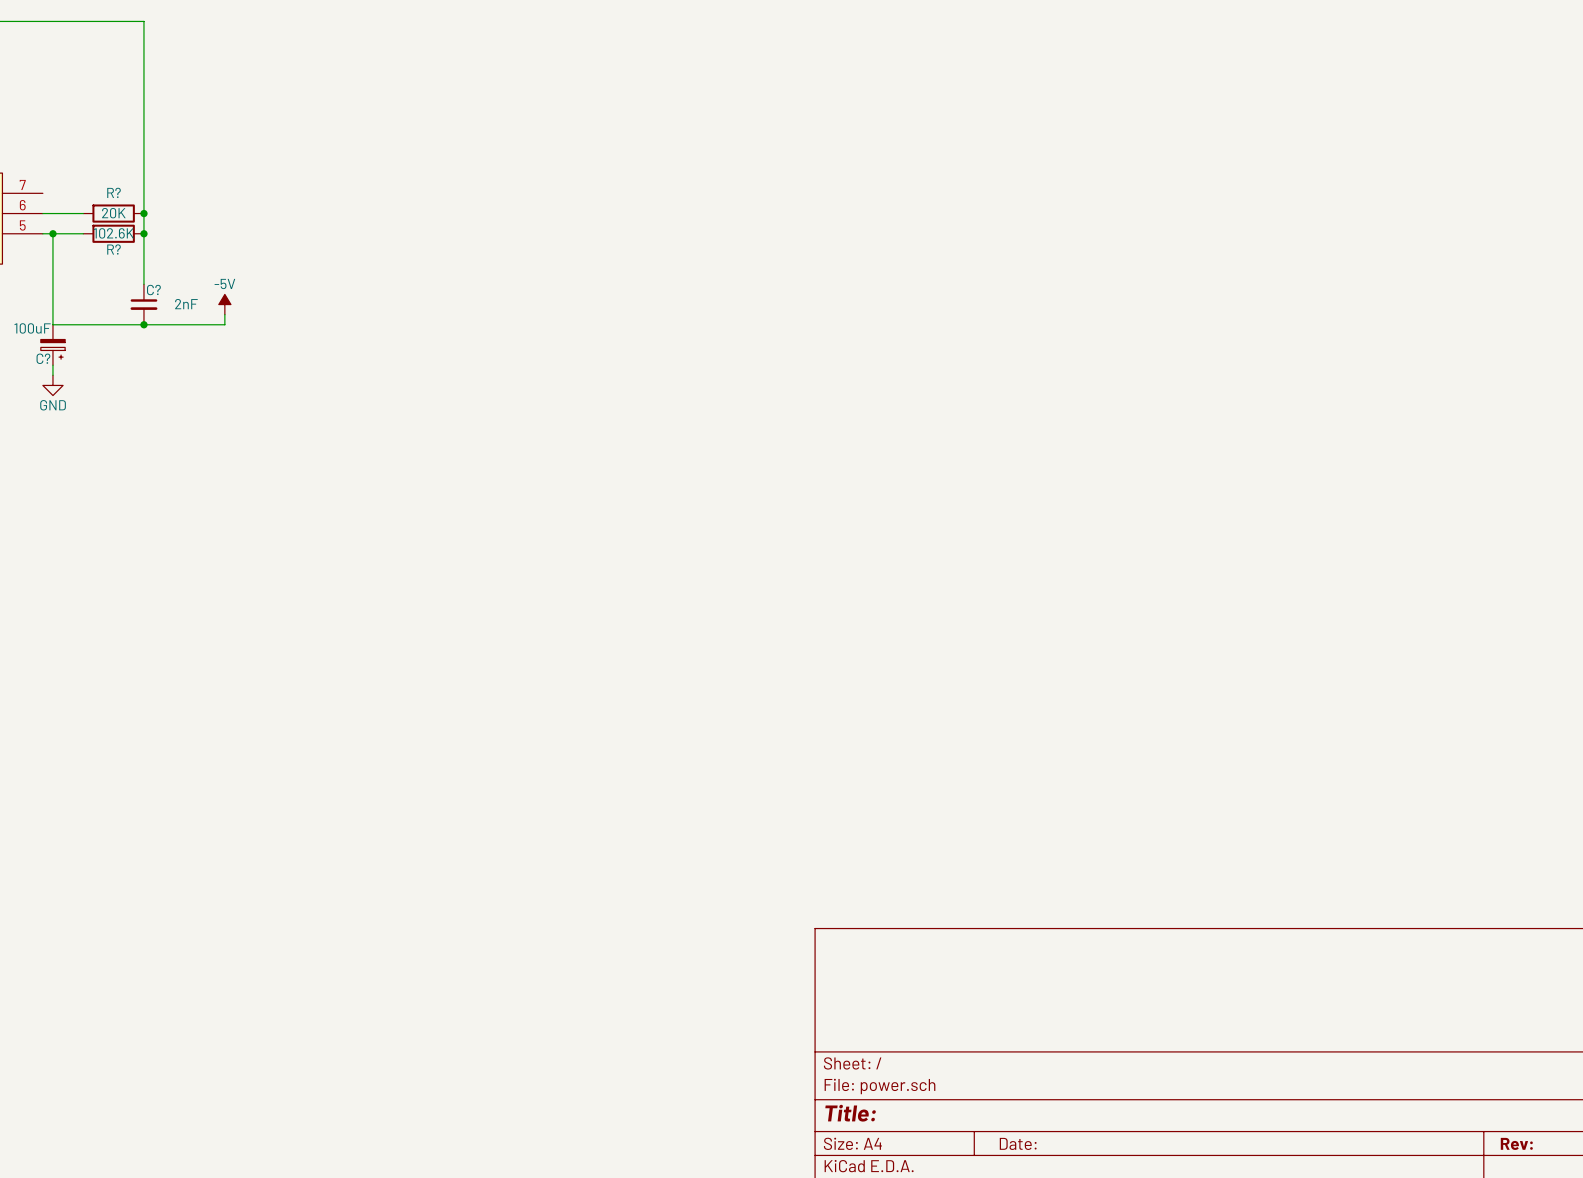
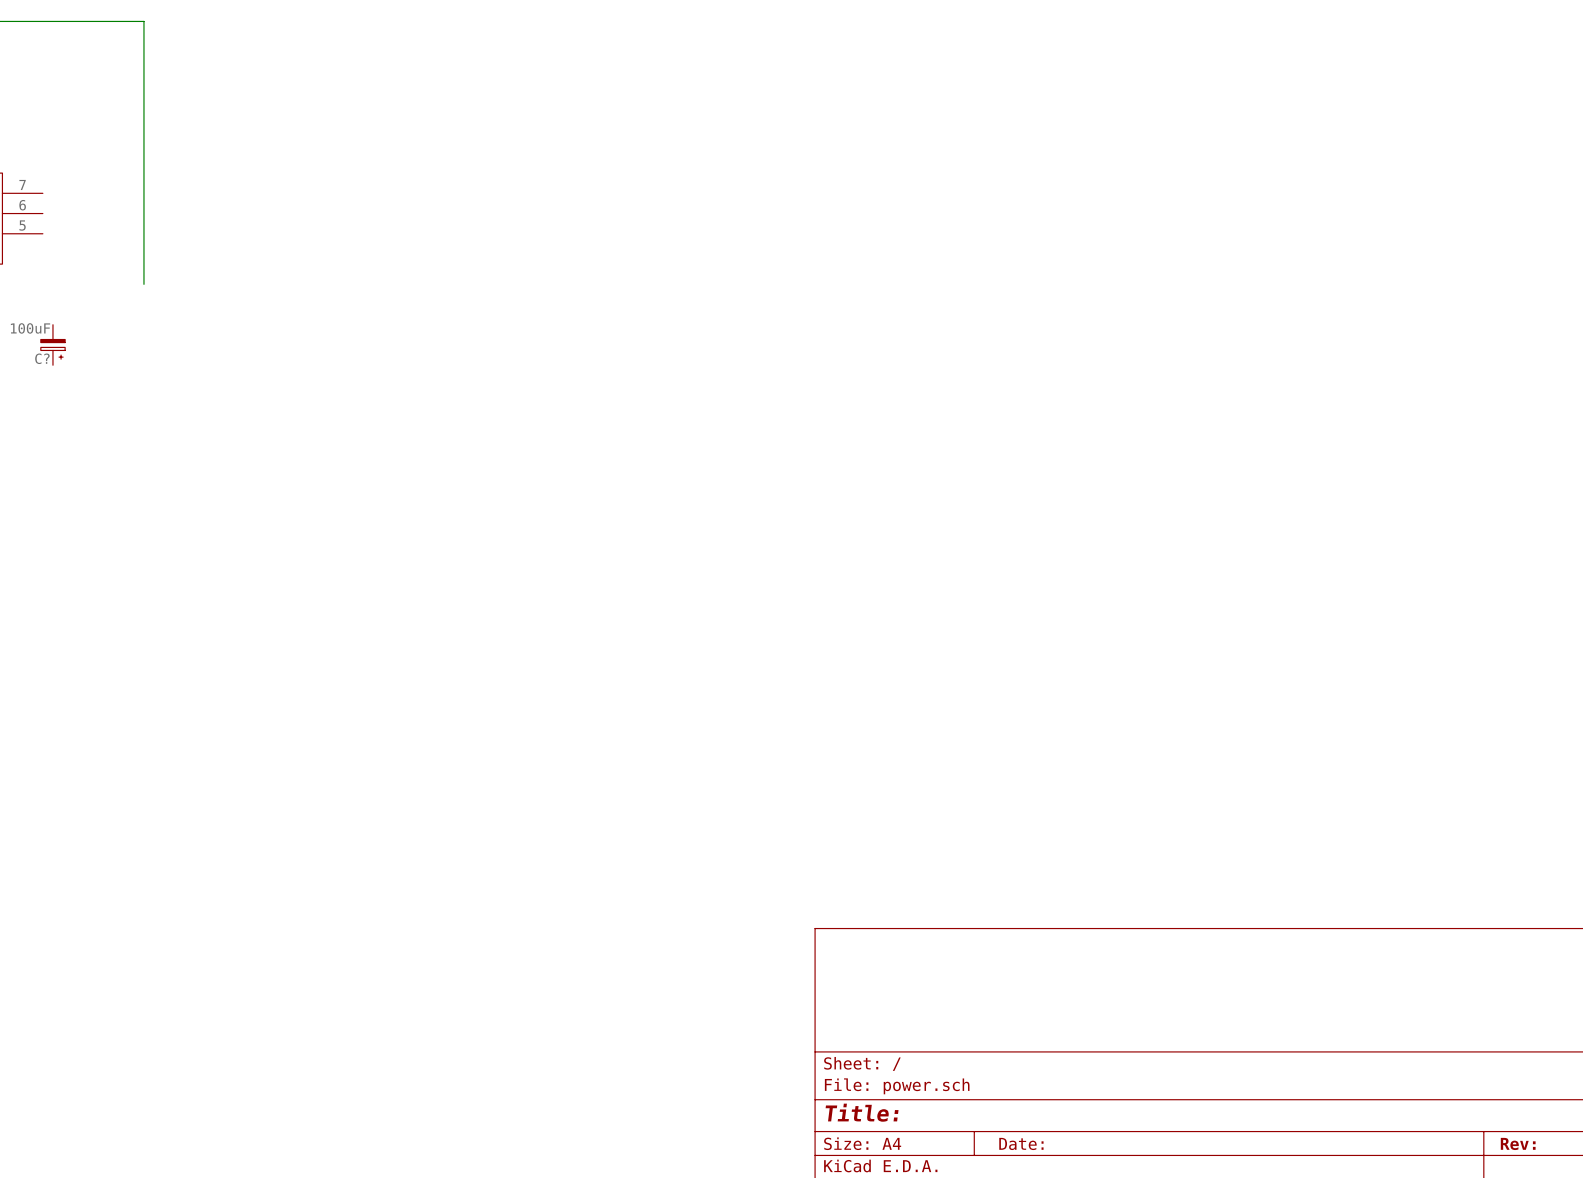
wire: (42, 213) (83, 213) -> none
R?: 20K (113, 213) -> none
junction: (143, 213) -> none
wire: (42, 233) (83, 233) -> none
wire: (52, 233) (52, 324) (224, 324) (224, 314) -> none
junction: (52, 233) -> none
R?: 102.6K (113, 233) -> none
junction: (143, 233) -> none
C?: 2nF (143, 304) -> none
power symbol: -5V (224, 304) -> none
junction: (143, 324) -> none
wire: (52, 365) (52, 375) -> none
power symbol: GND (52, 385) -> none

